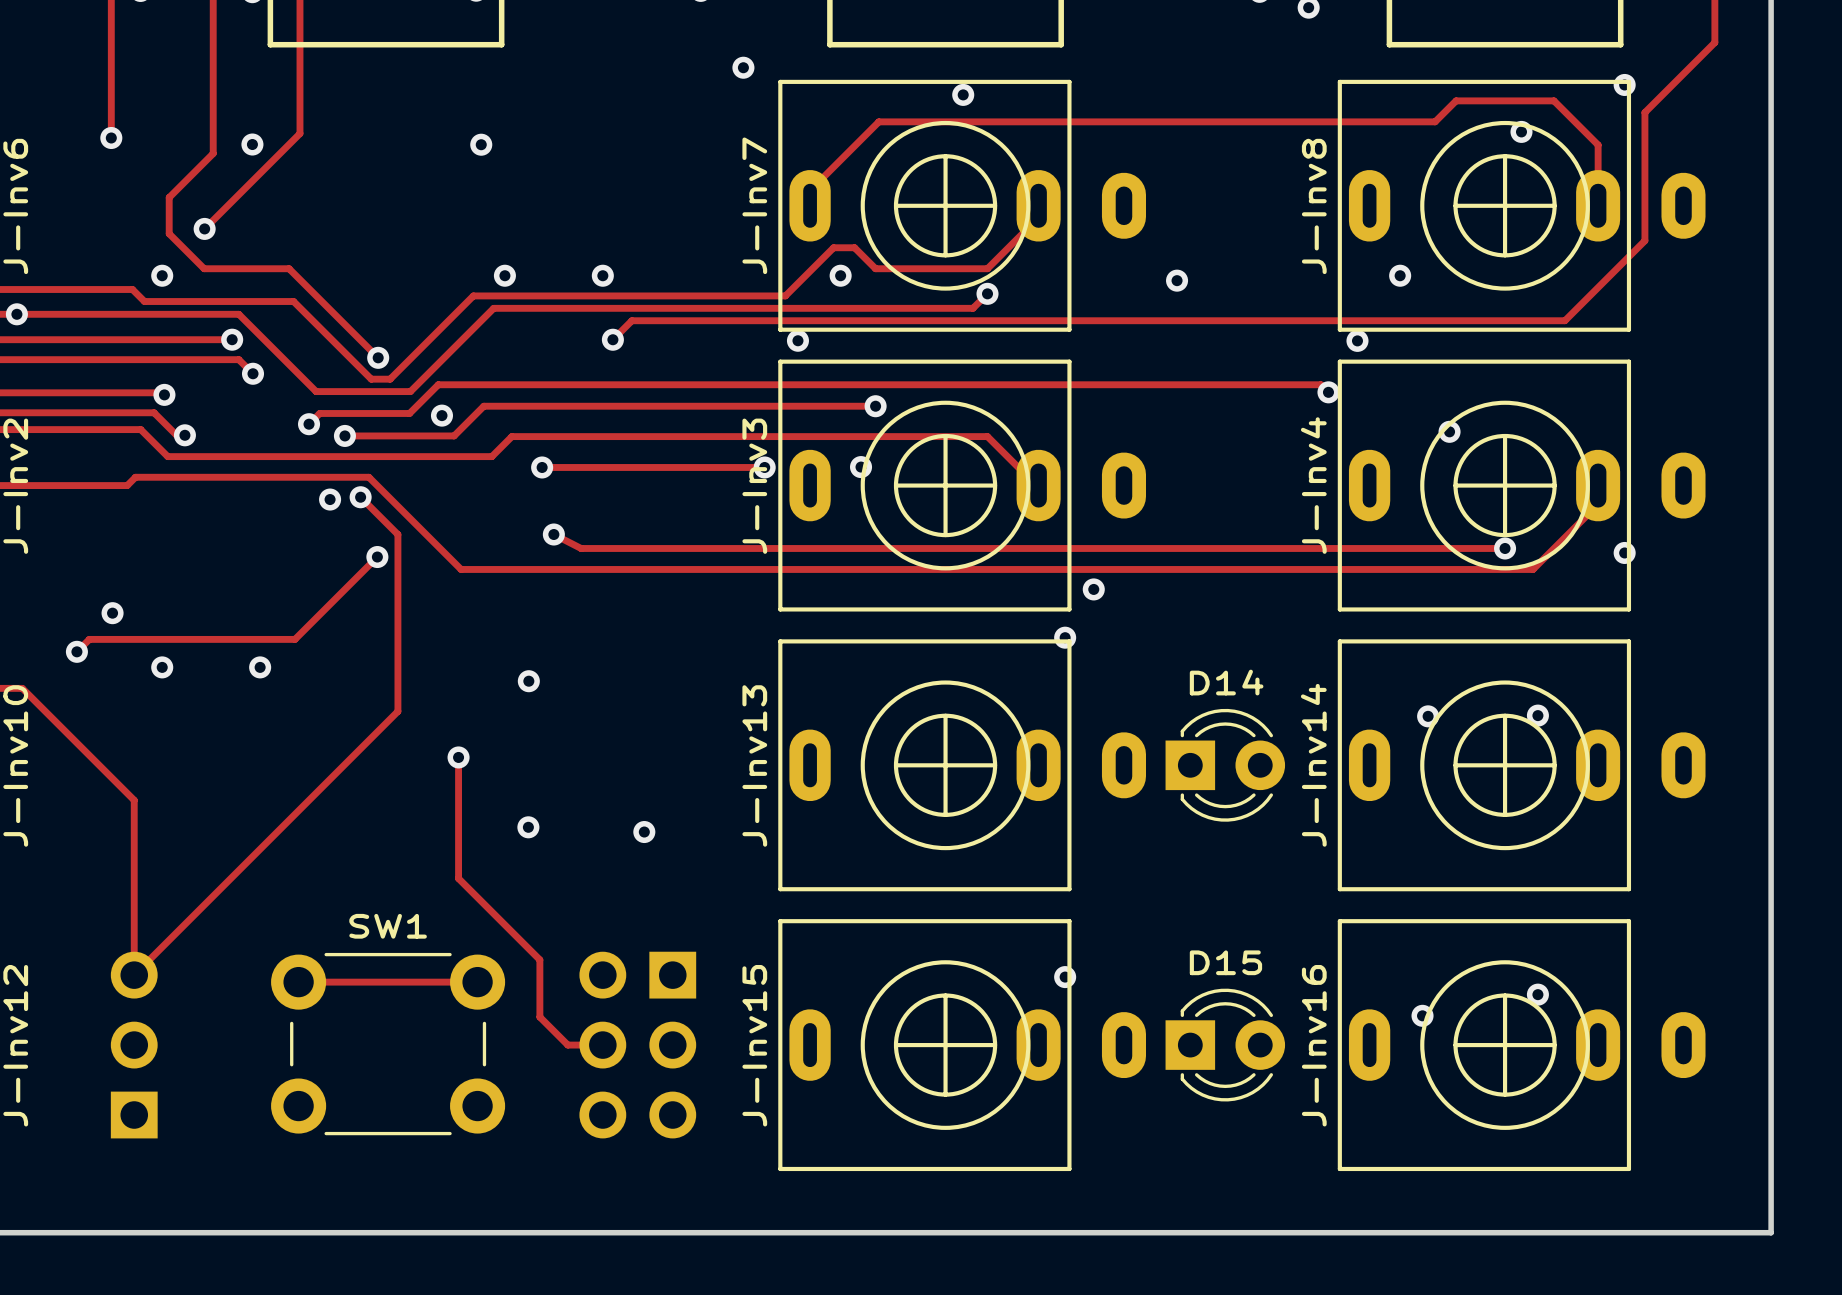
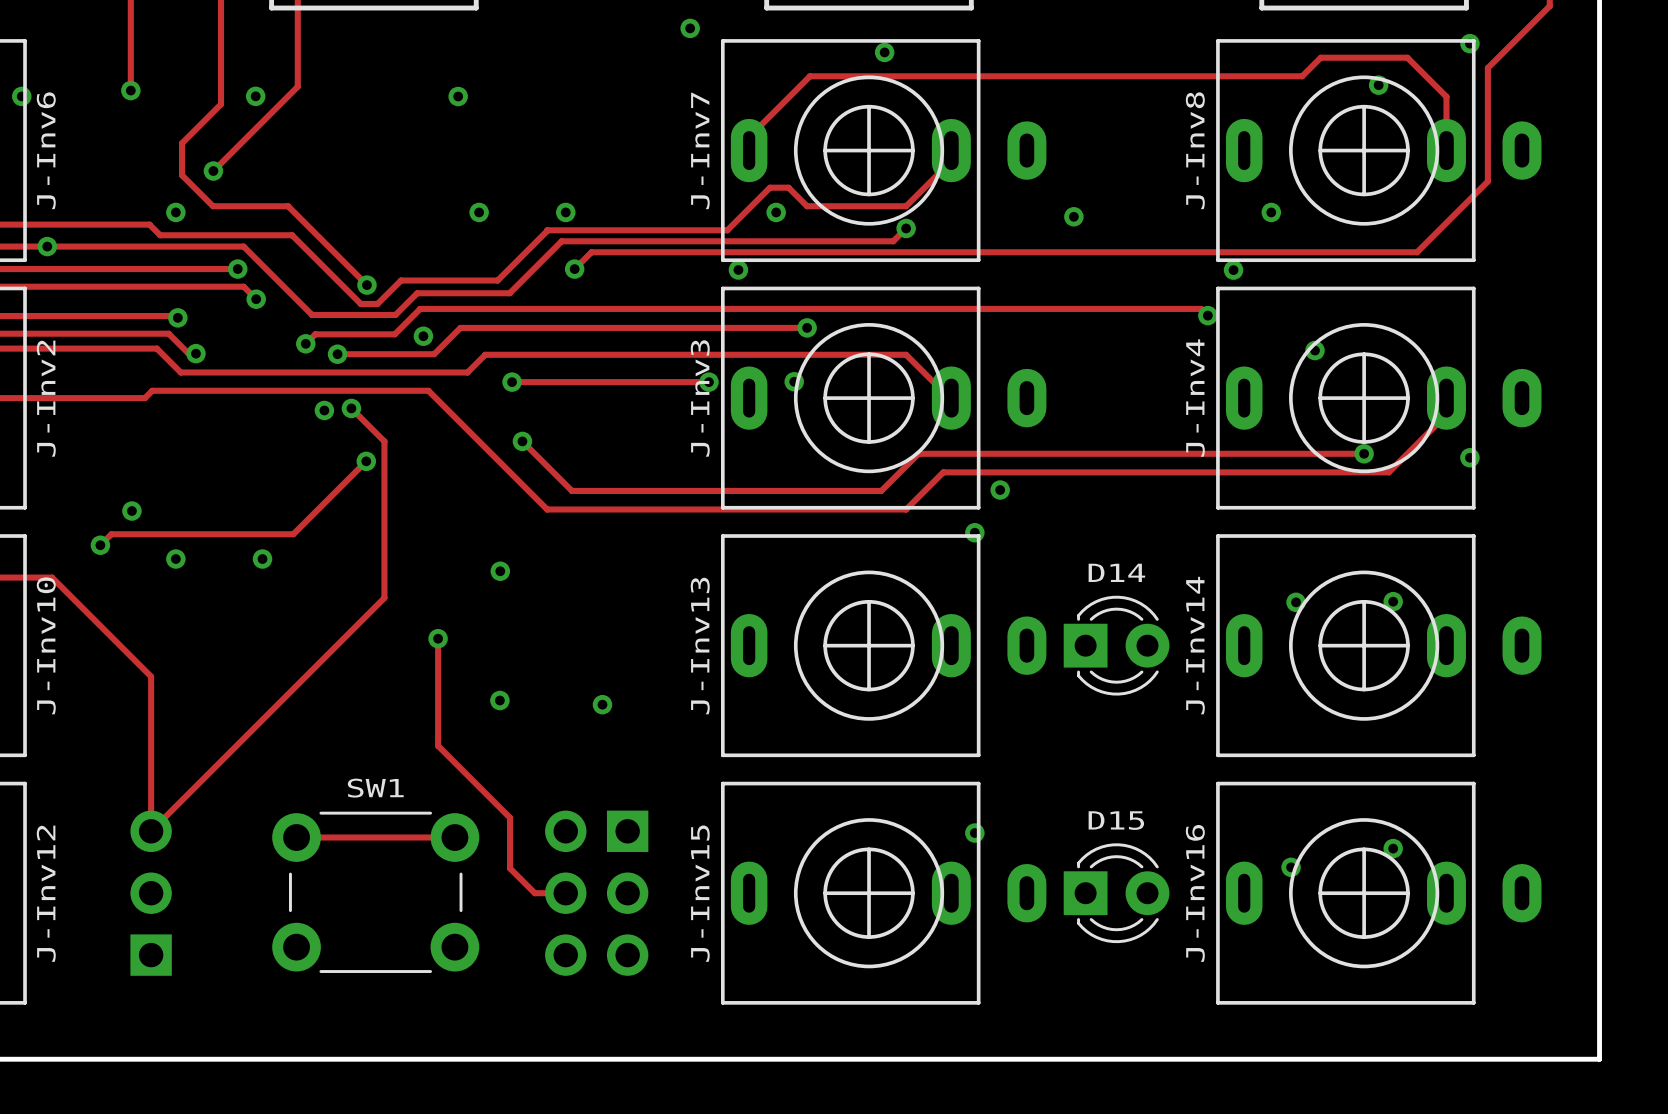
track: (581, 295) (473, 295) (416, 352) -> (547, 230) (497, 280) (401, 280)
track: (598, 308) (493, 308) (434, 367) -> (561, 241) (509, 293) (417, 293)
track: (368, 477) (461, 569) (1029, 569) -> (358, 390) (428, 390) (547, 509) (906, 509) (943, 472)
track: (553, 534) (581, 548) (1001, 548) -> (522, 441) (571, 490) (881, 490) (918, 453)

